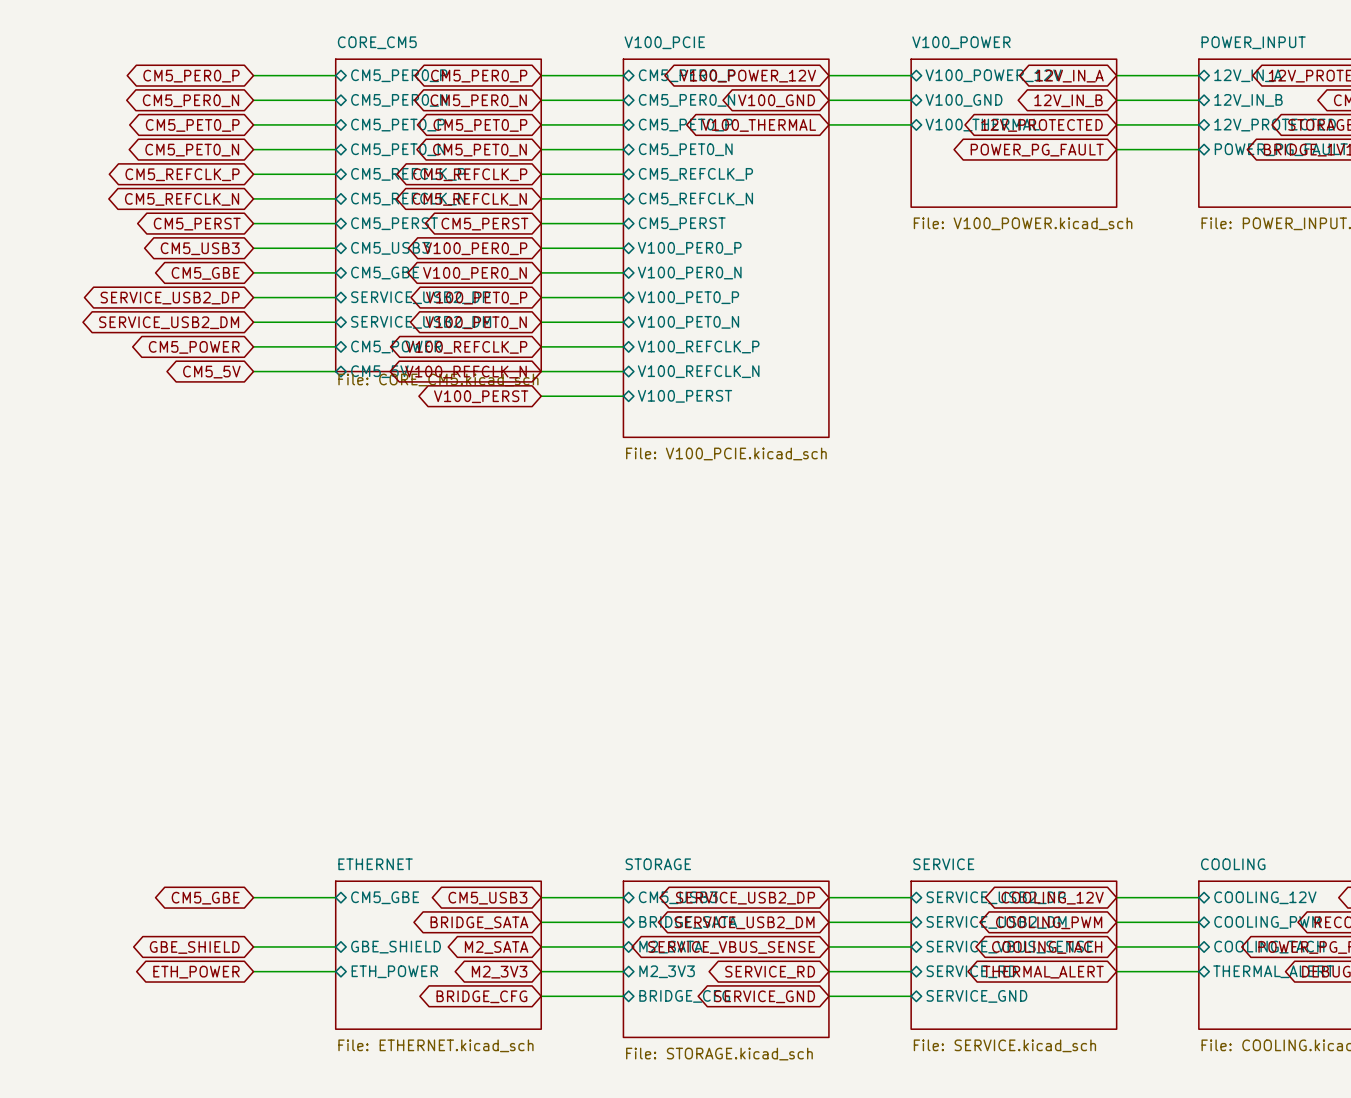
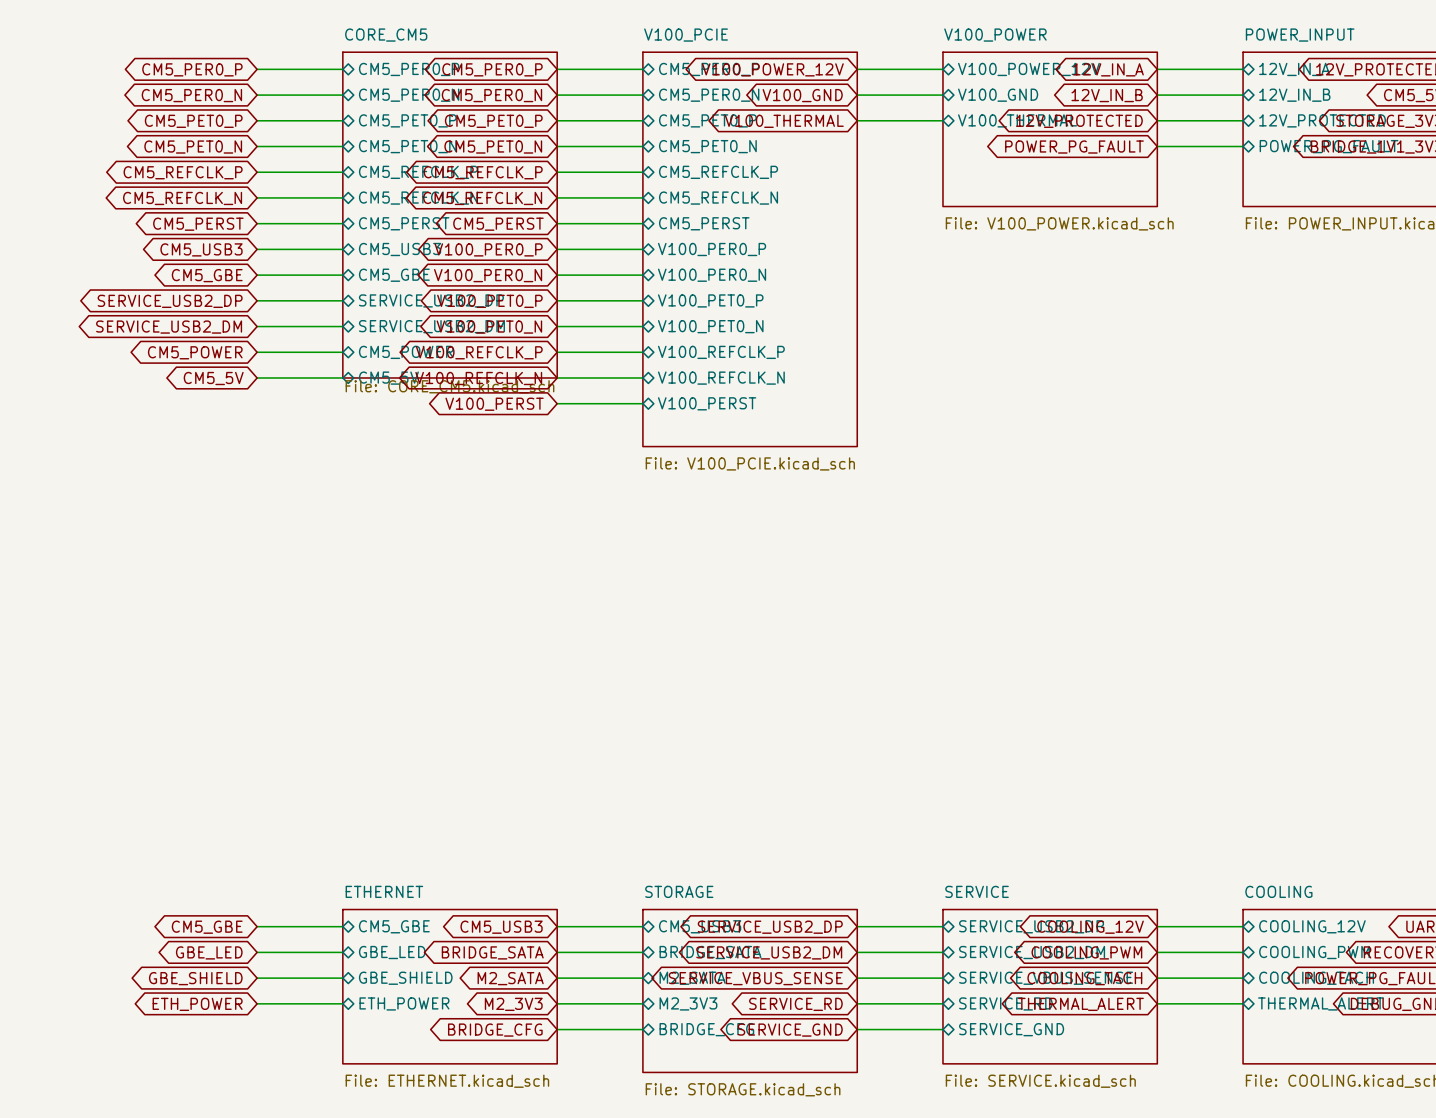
global label: none -> GBE_LED (209, 952)
wire: none -> (257, 952) (342, 952)
sheet pin: none -> GBE_LED (392, 952)

